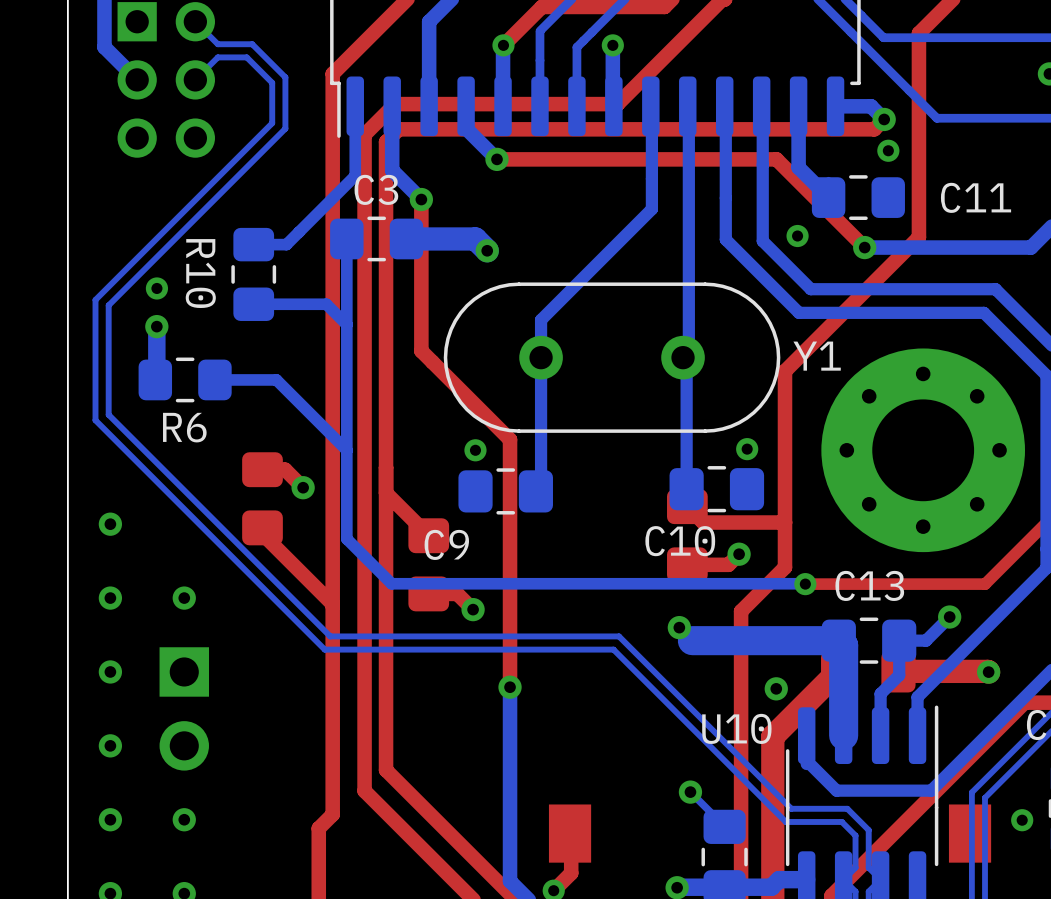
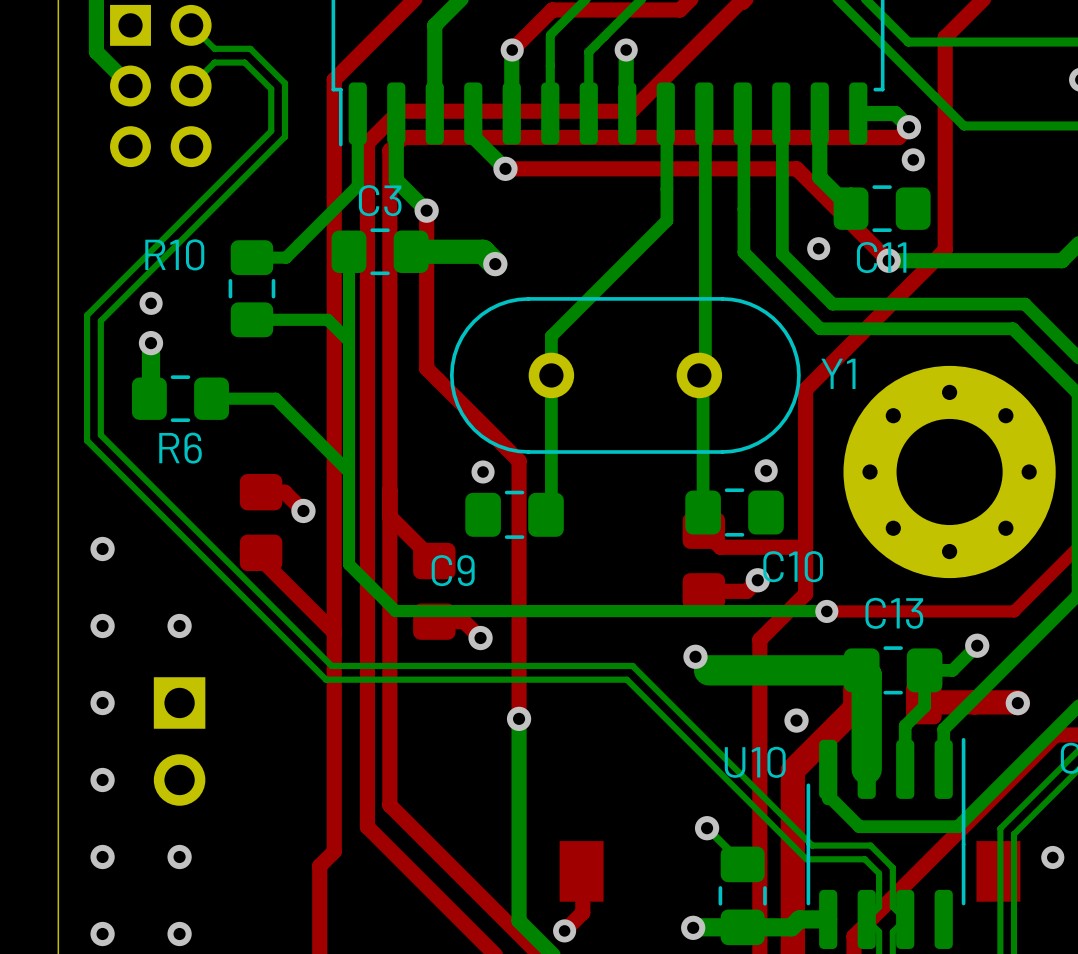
C11 name position: C11 (976, 197) -> C11 (881, 257)
R10 name rotation: 0° (200, 273) -> 90° counterclockwise (174, 254)
C10 name position: C10 (680, 541) -> C10 (793, 566)

